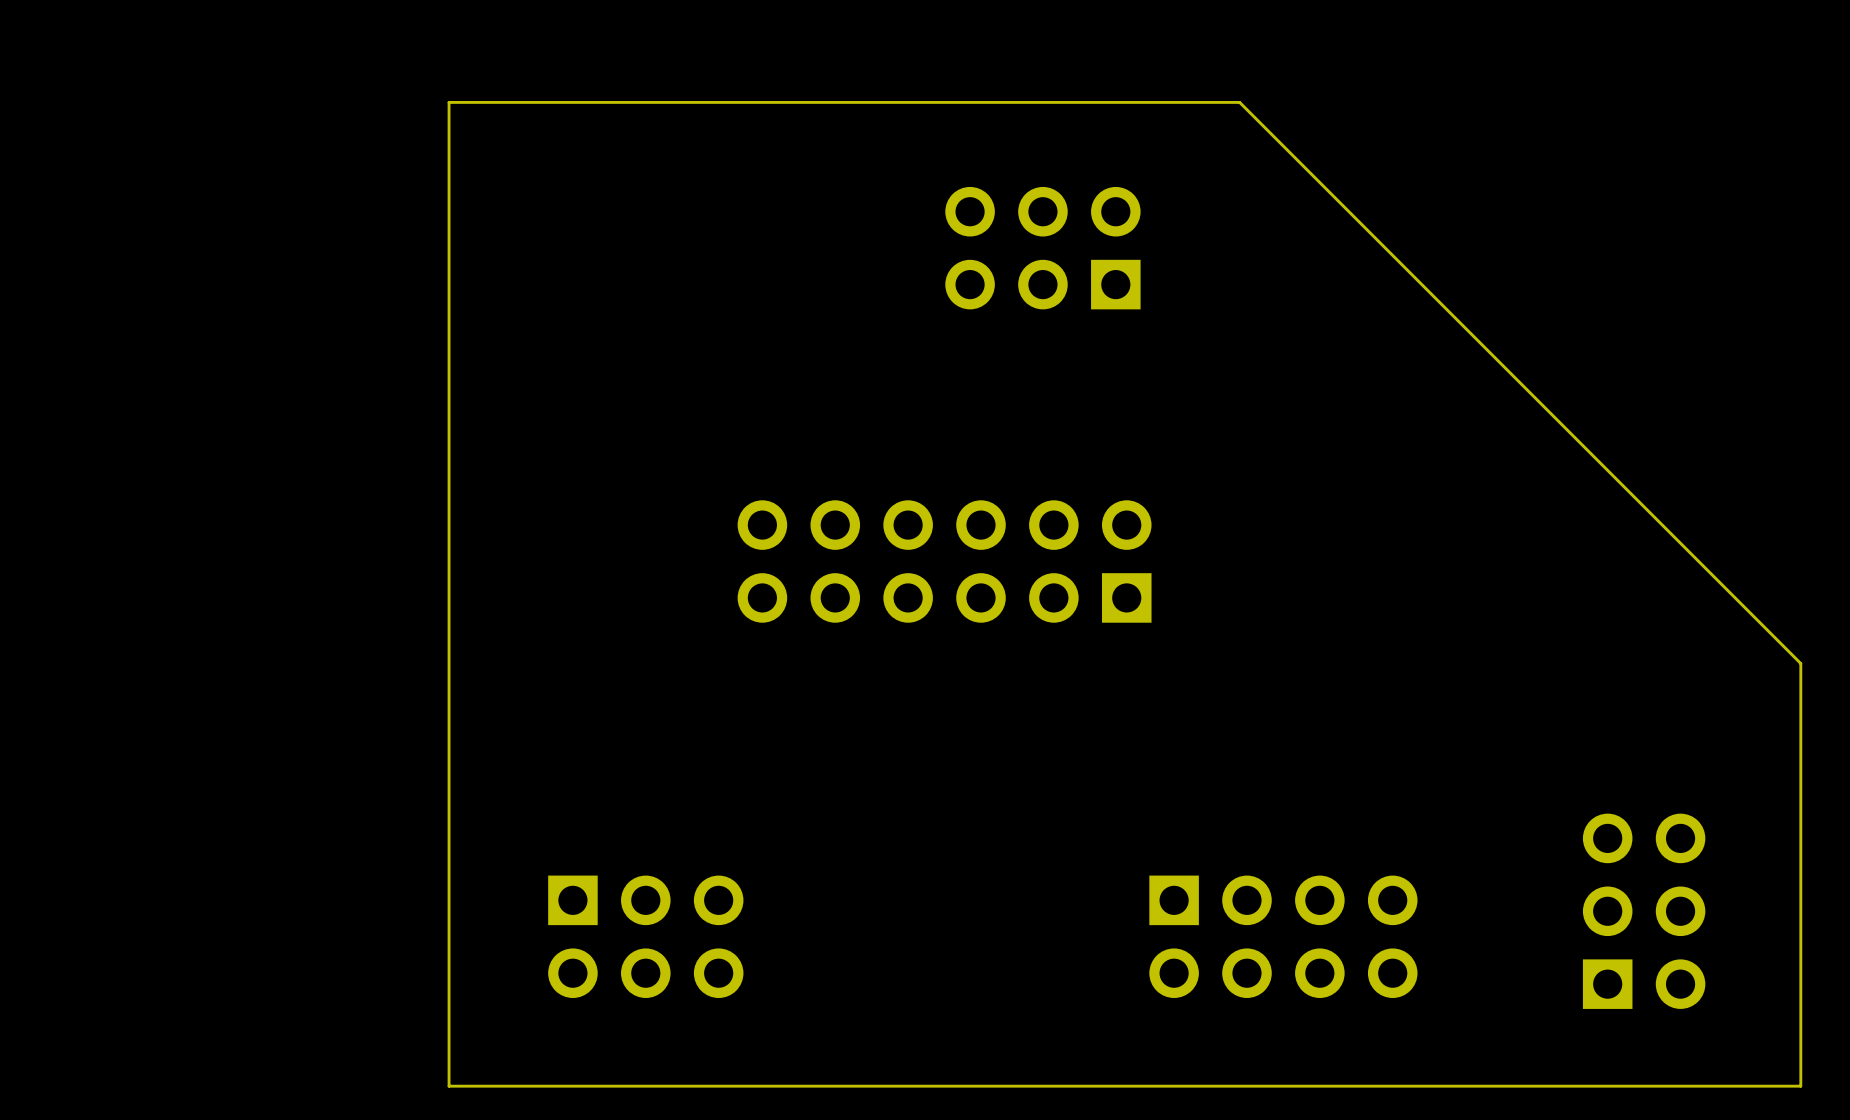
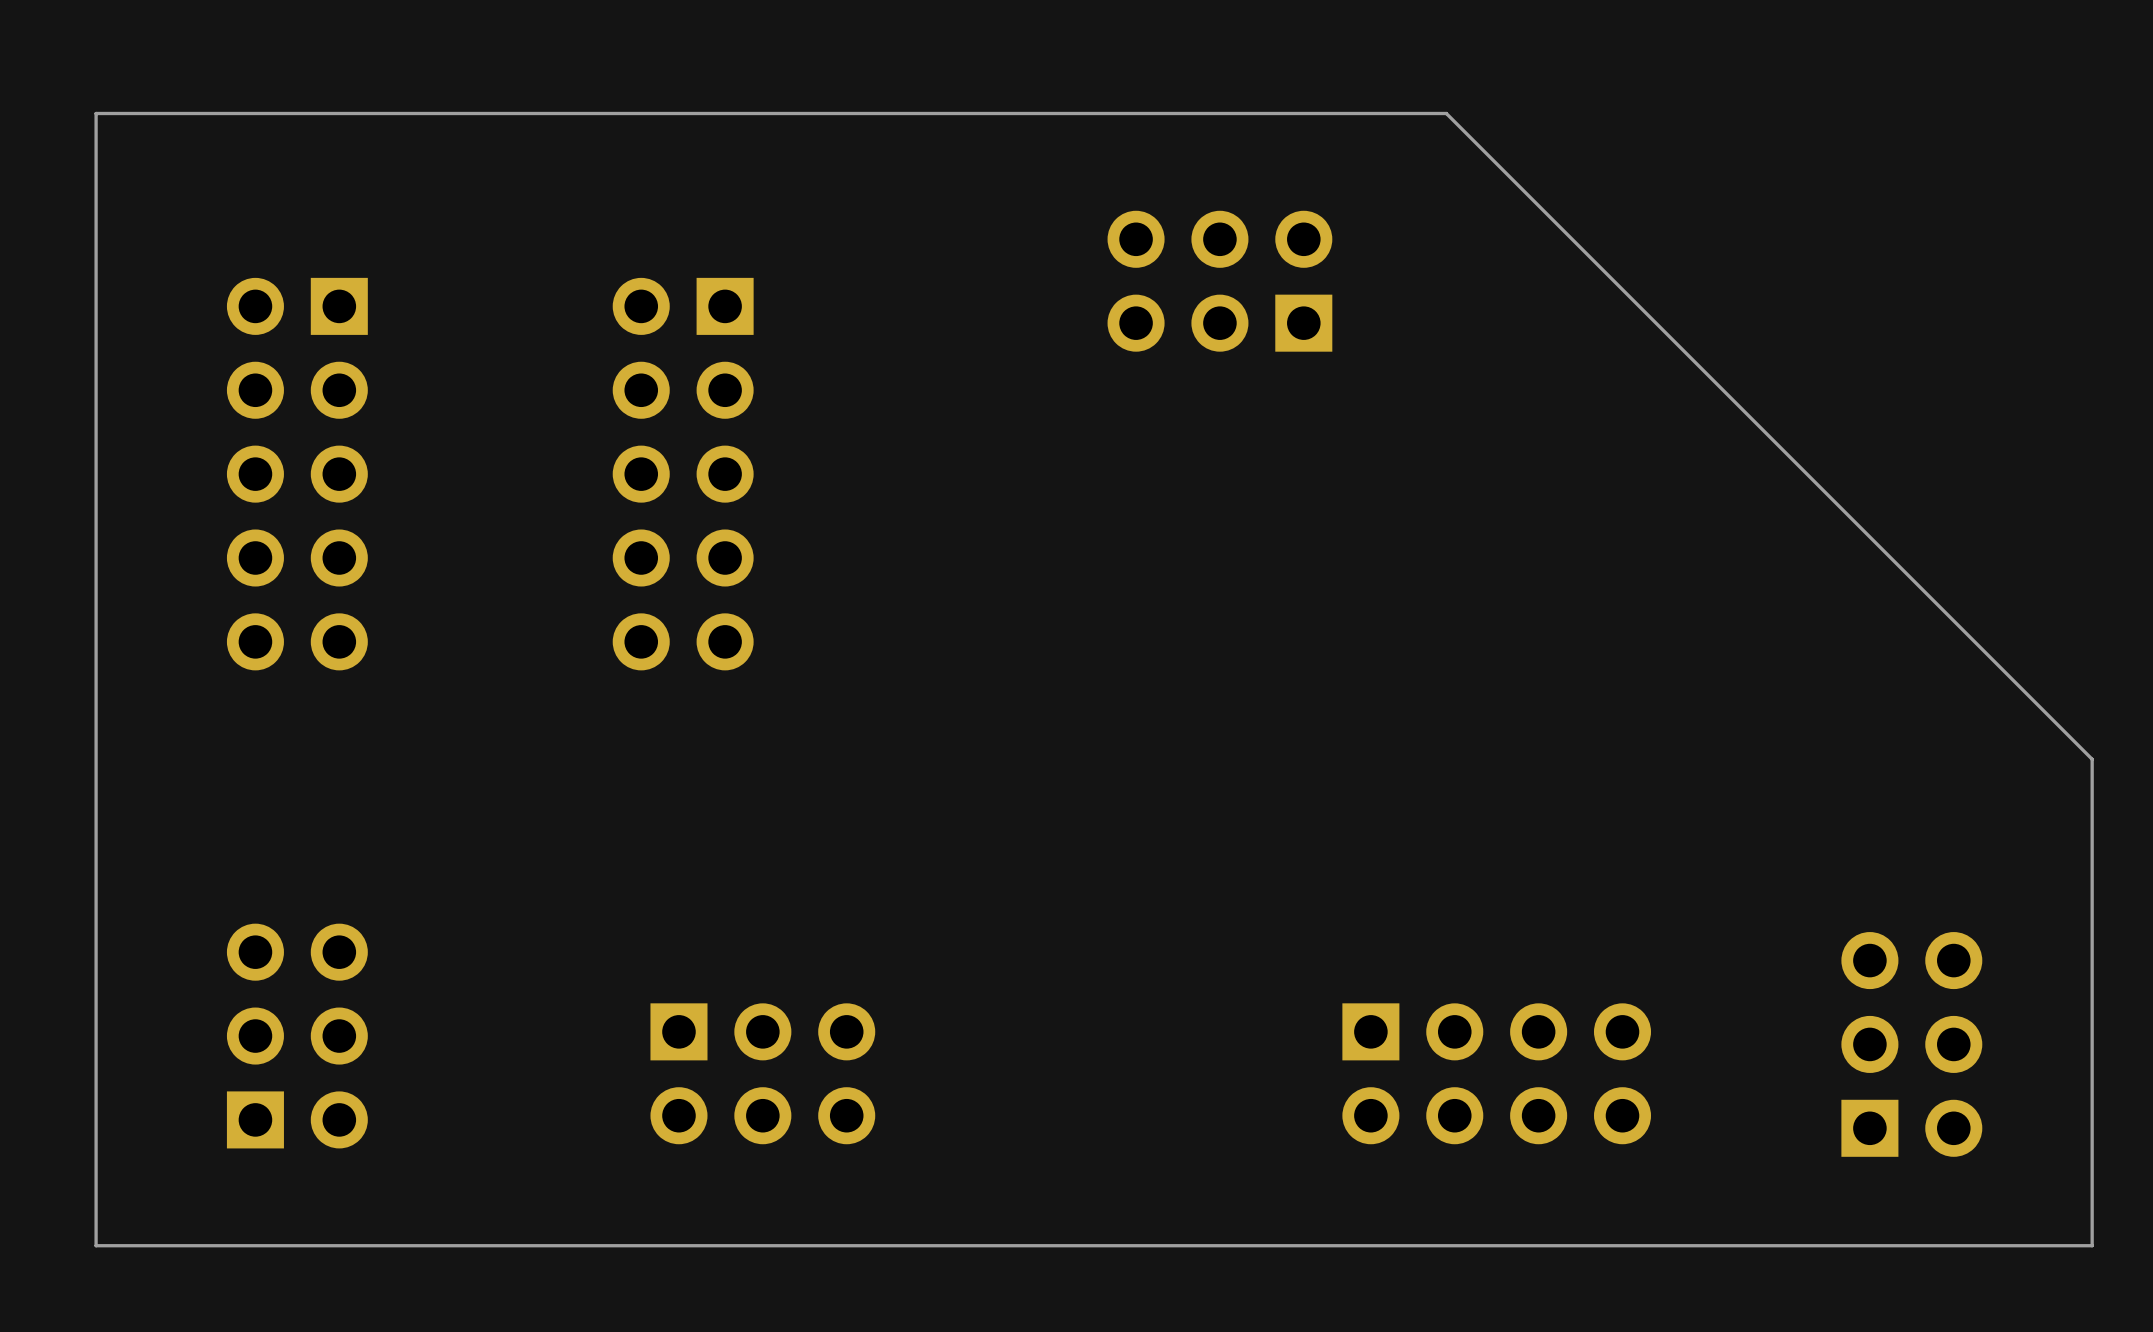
board edge: (449, 102) (449, 1086) -> (536, 113) (96, 113) (96, 1245) (536, 1245)
part: none -> (297, 474)
part: none -> (683, 474)
part: (944, 561) -> none
part: none -> (297, 1036)

